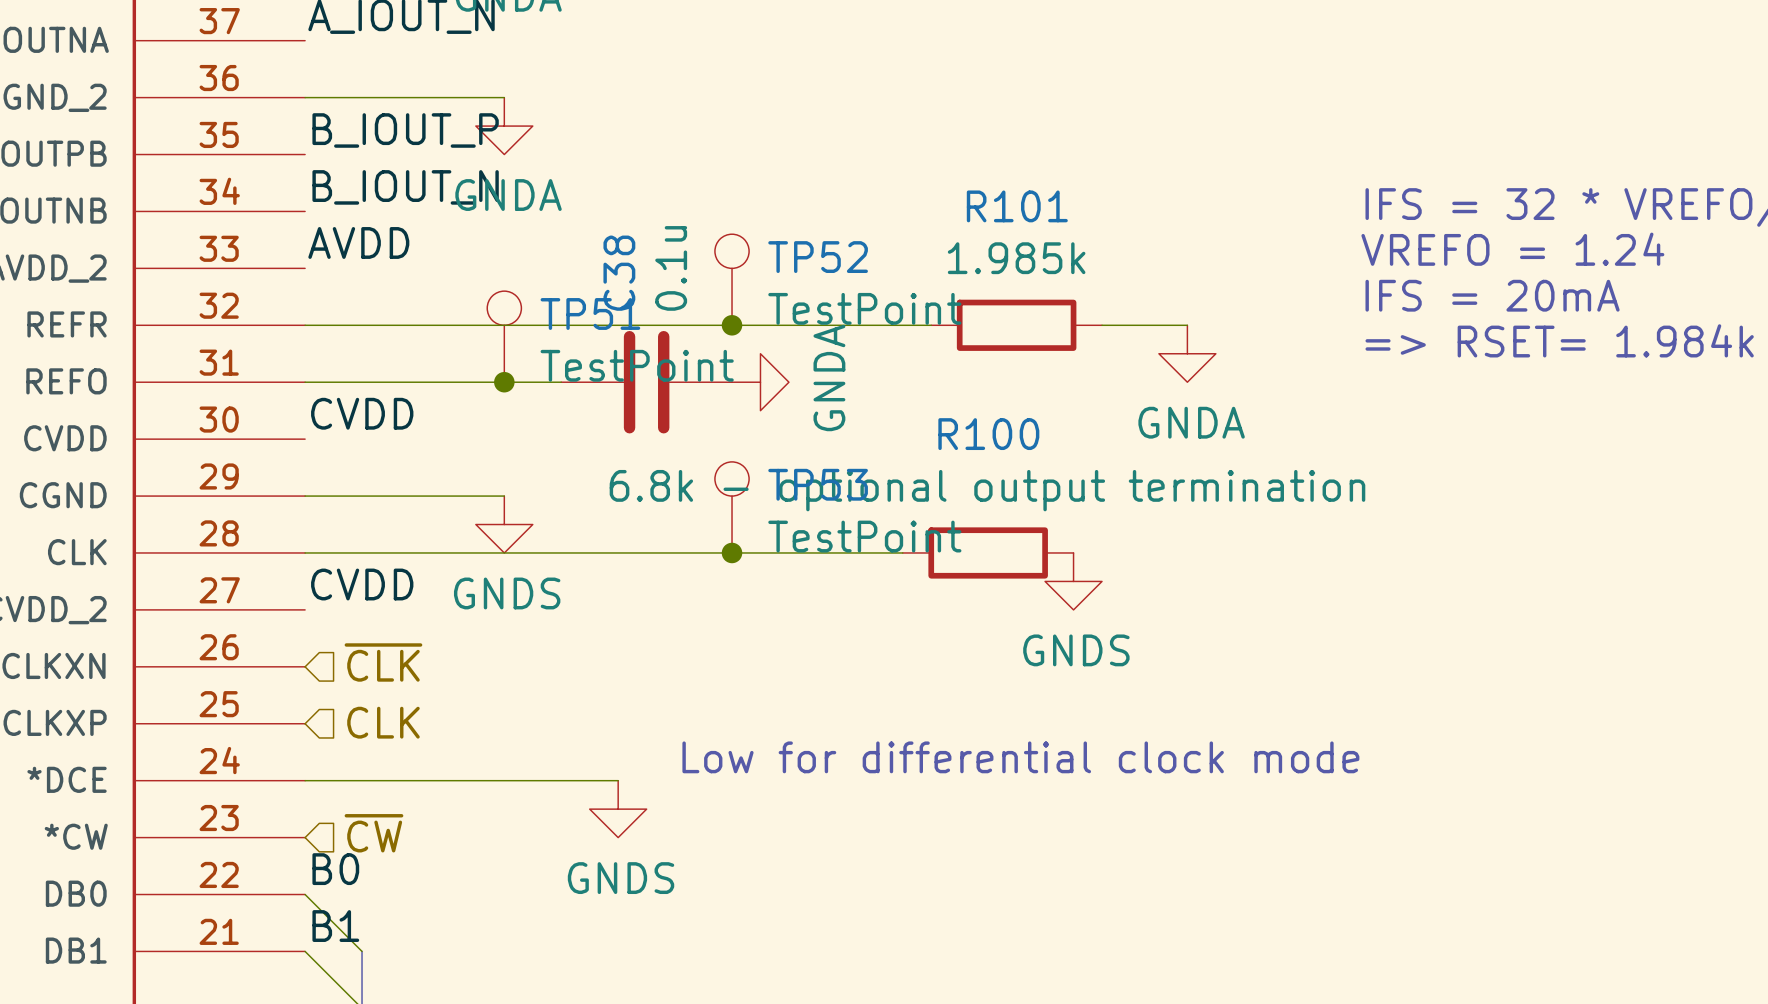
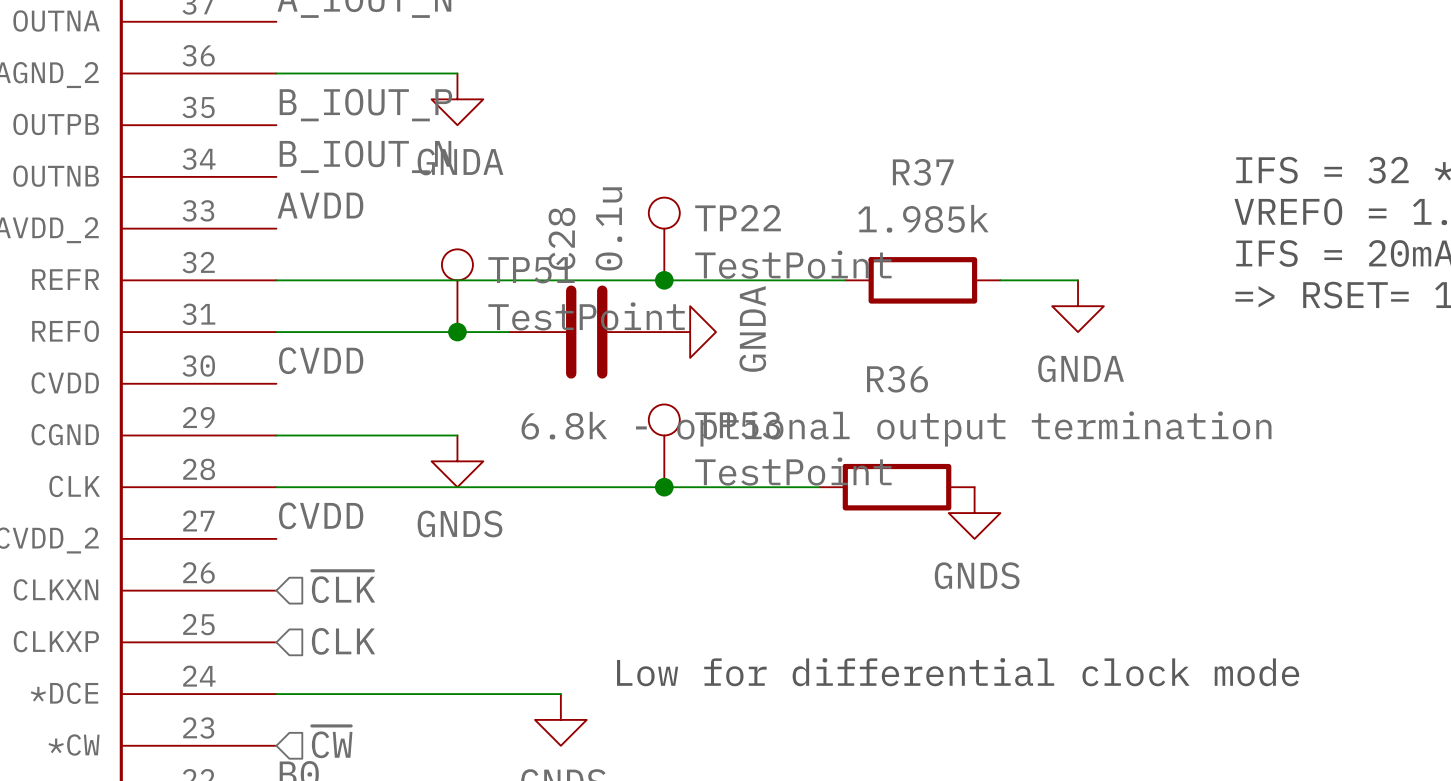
R101 name: R101 (1017, 206) -> R37 (923, 172)
TP52 name: TP52 (818, 257) -> TP22 (738, 218)
C38 name: C38 (619, 273) -> C28 (561, 238)
R100 name: R100 (988, 434) -> R36 (897, 379)

